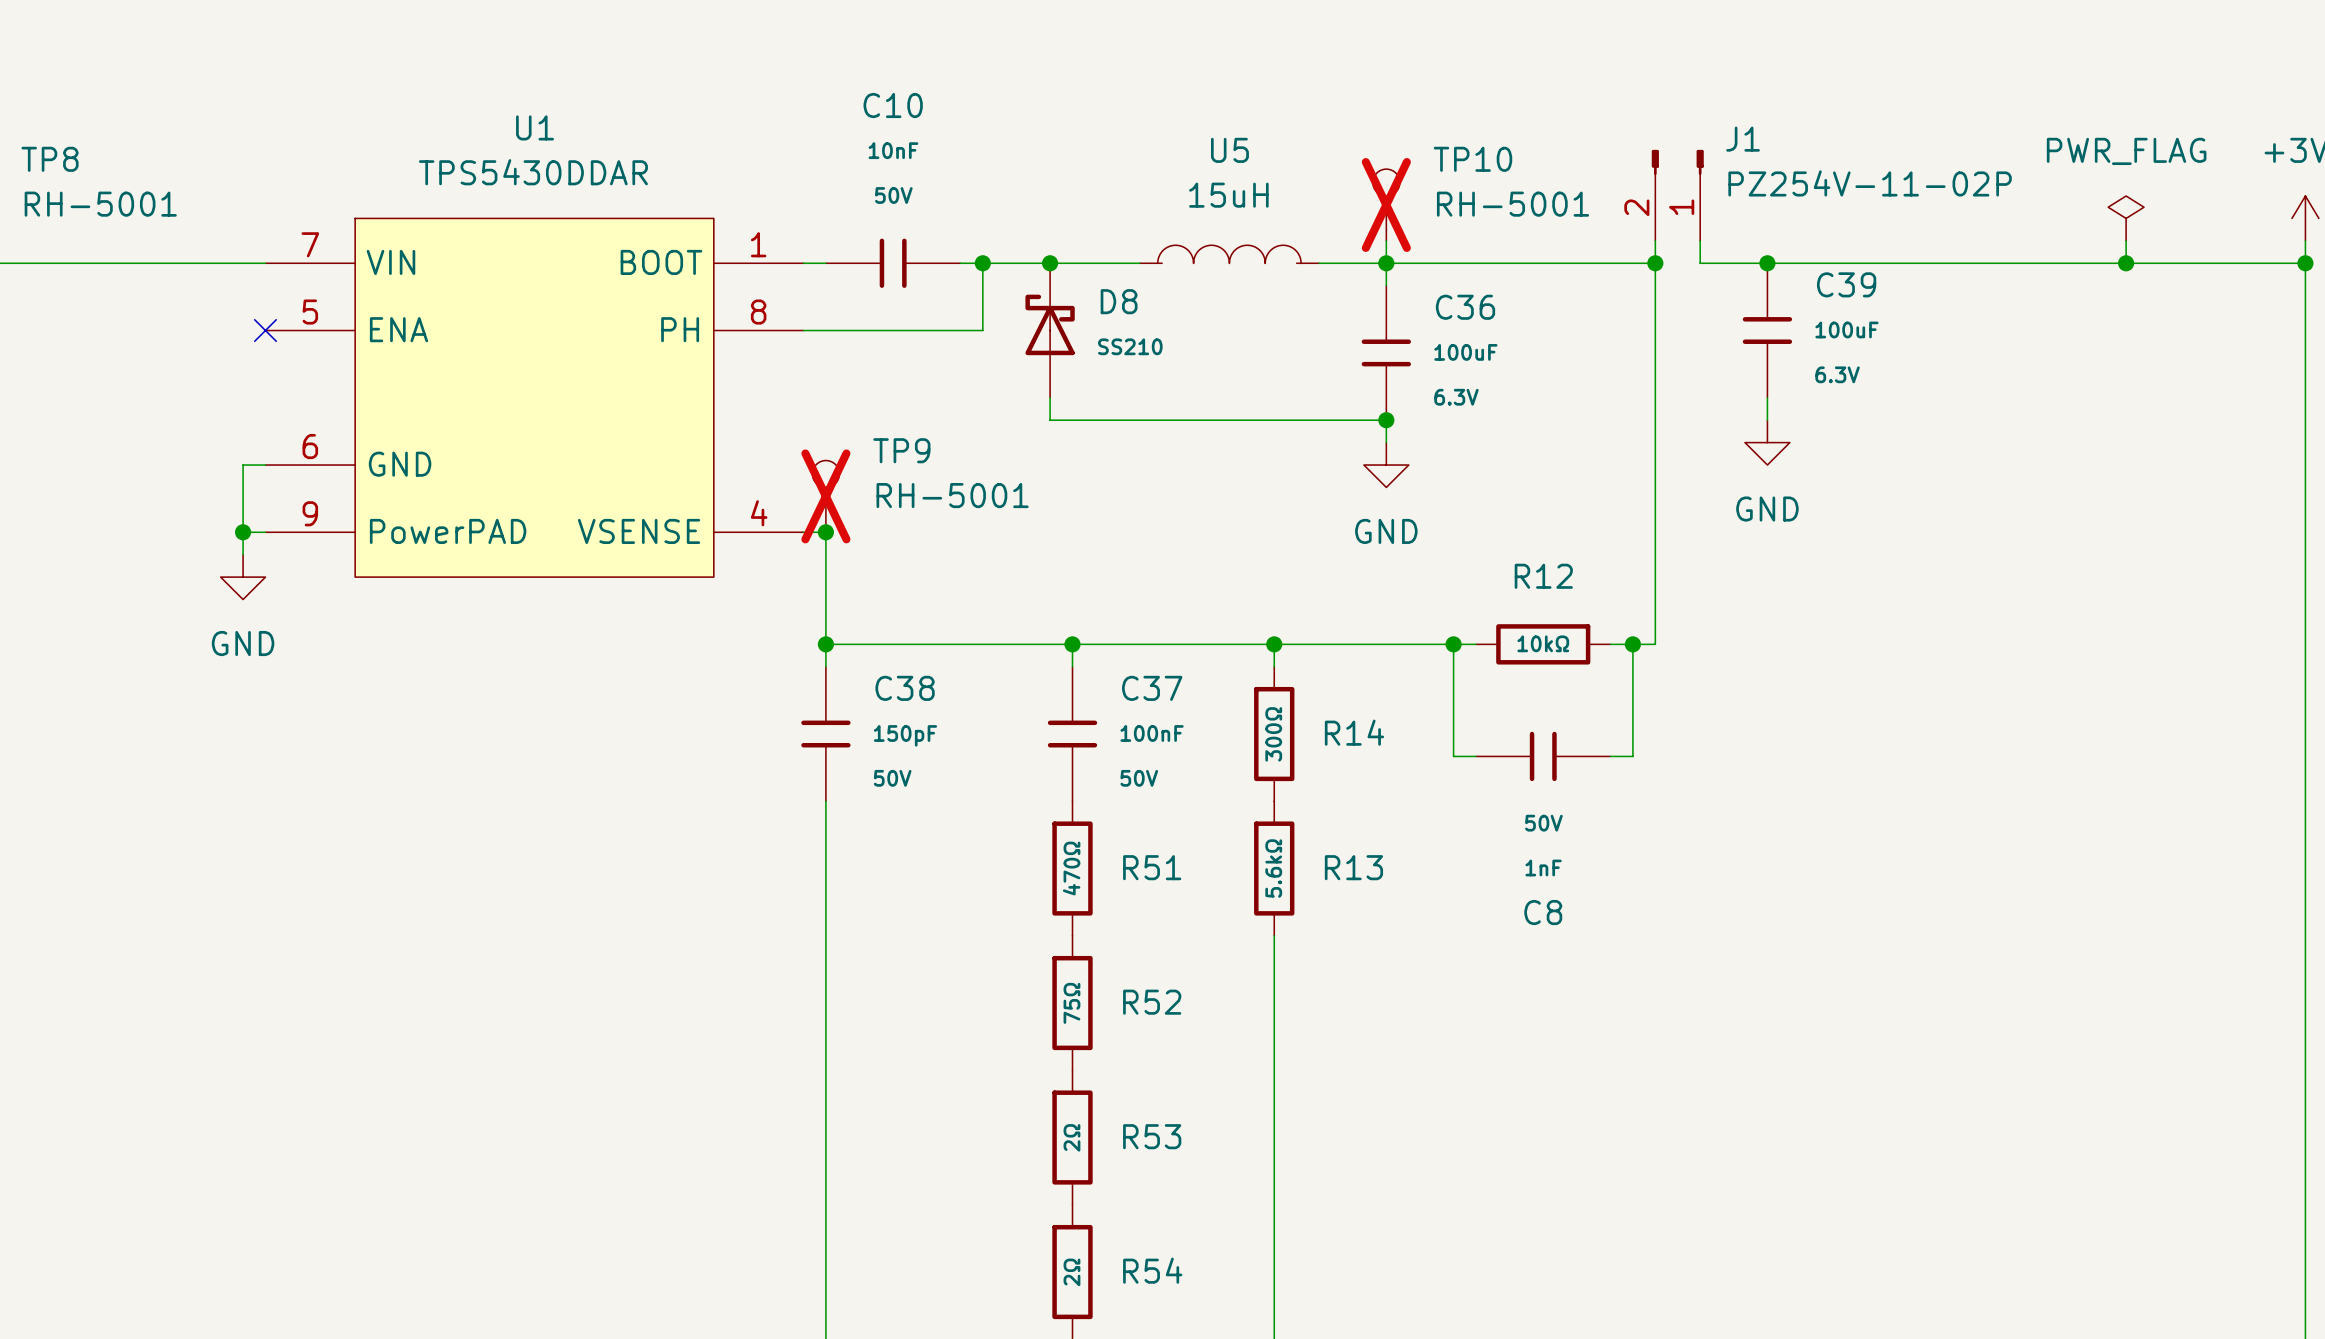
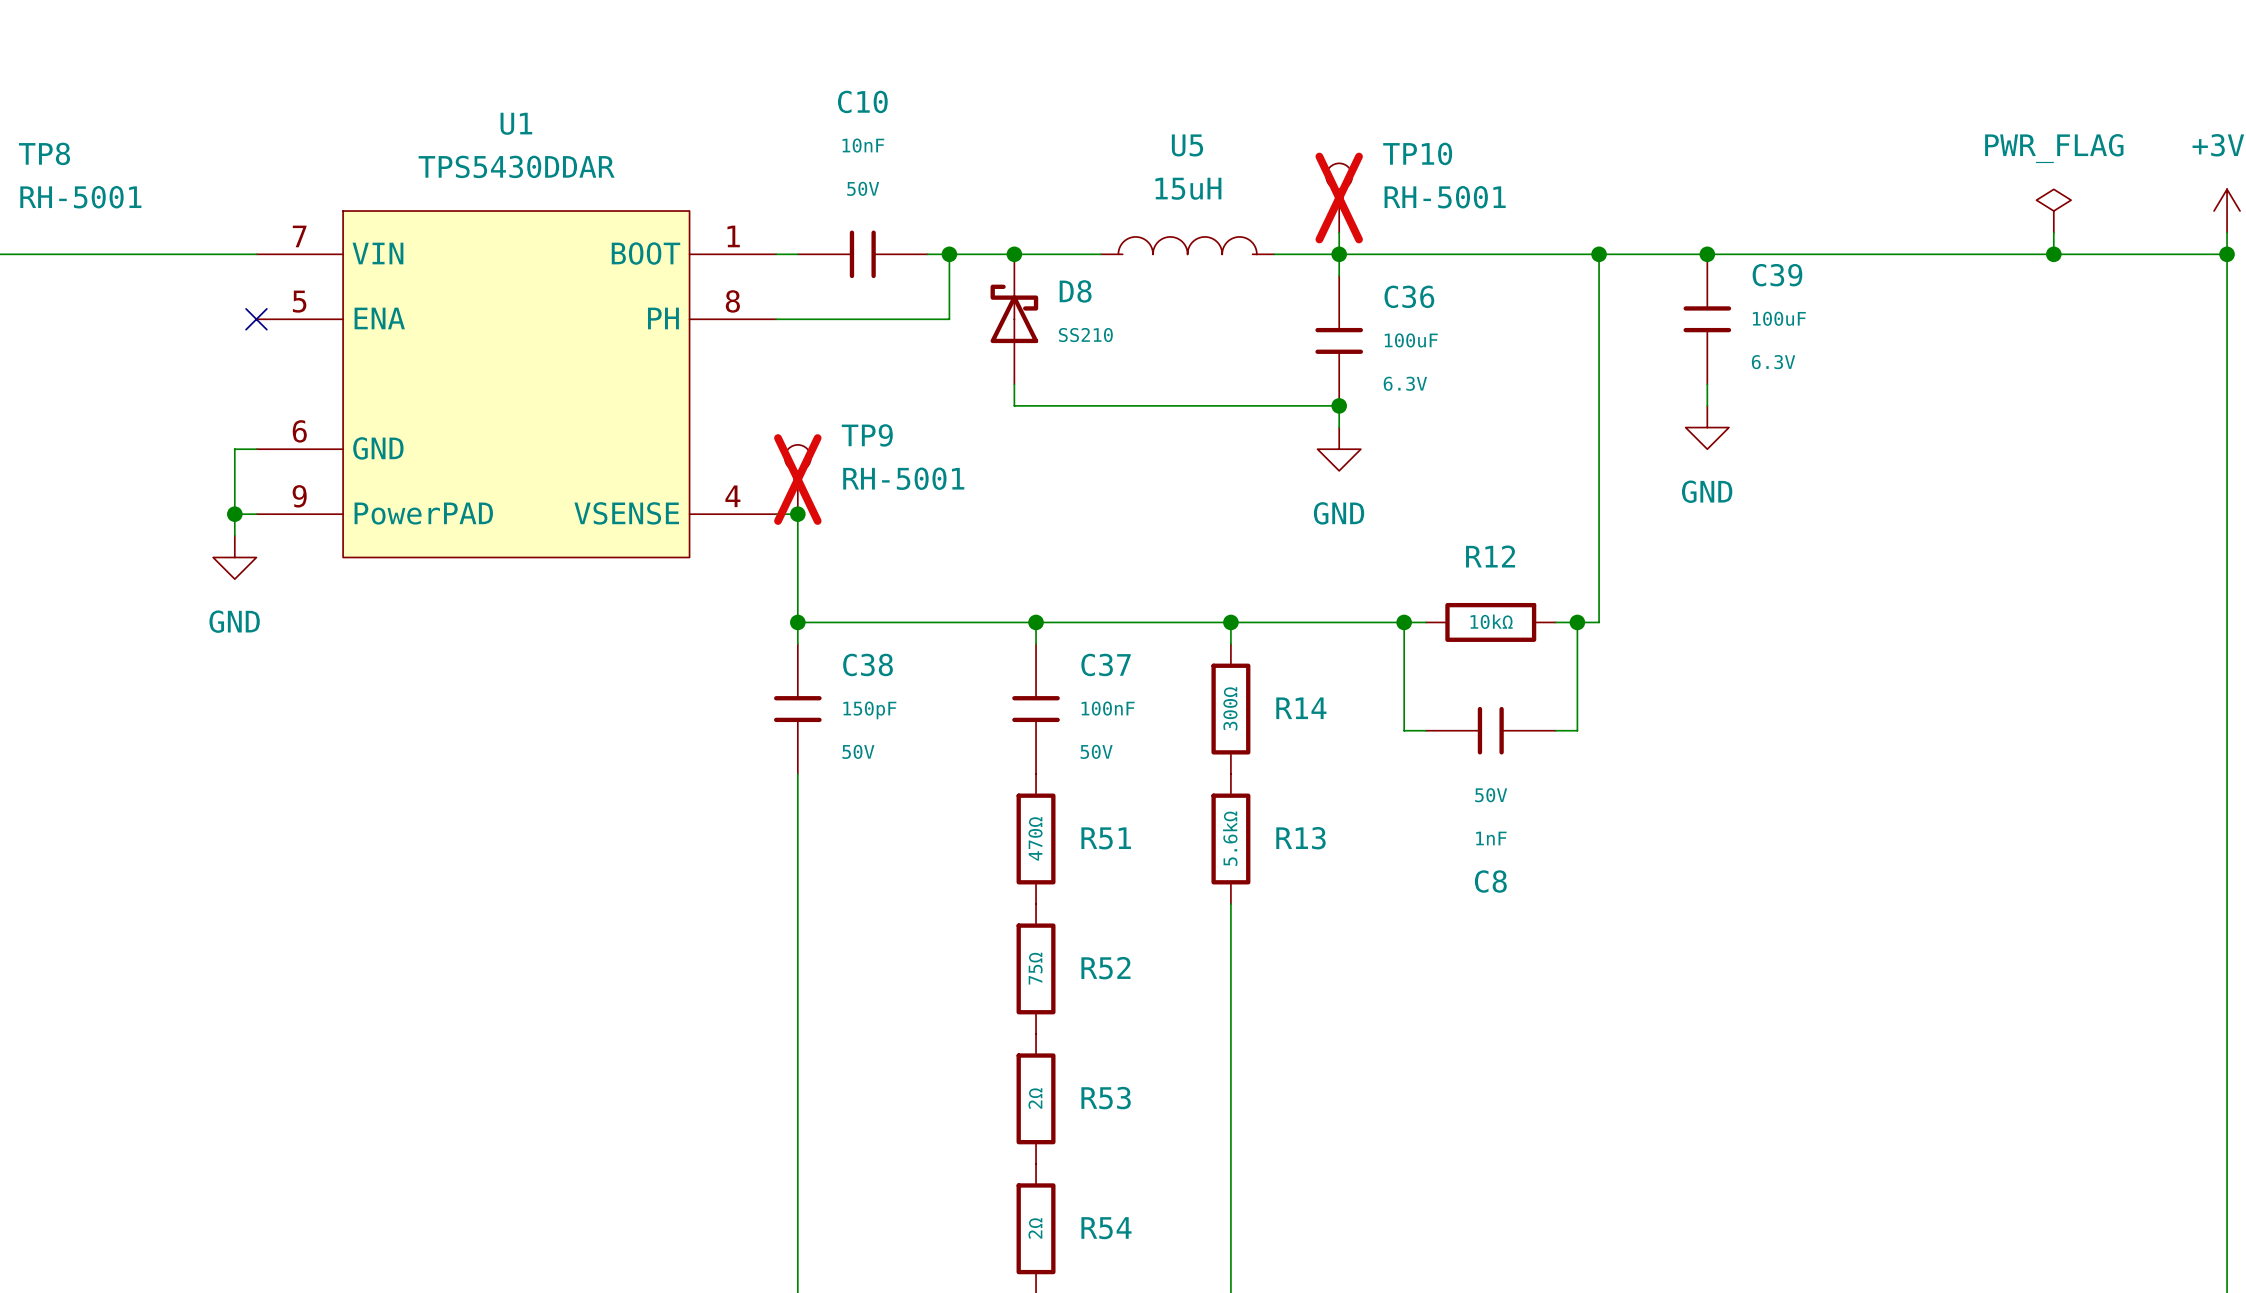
J1: PZ254V-11-02P (1677, 195) -> none
wire: (1655, 240) (1655, 263) -> (1642, 254) (1599, 254)
wire: (1700, 240) (1700, 263) -> none

